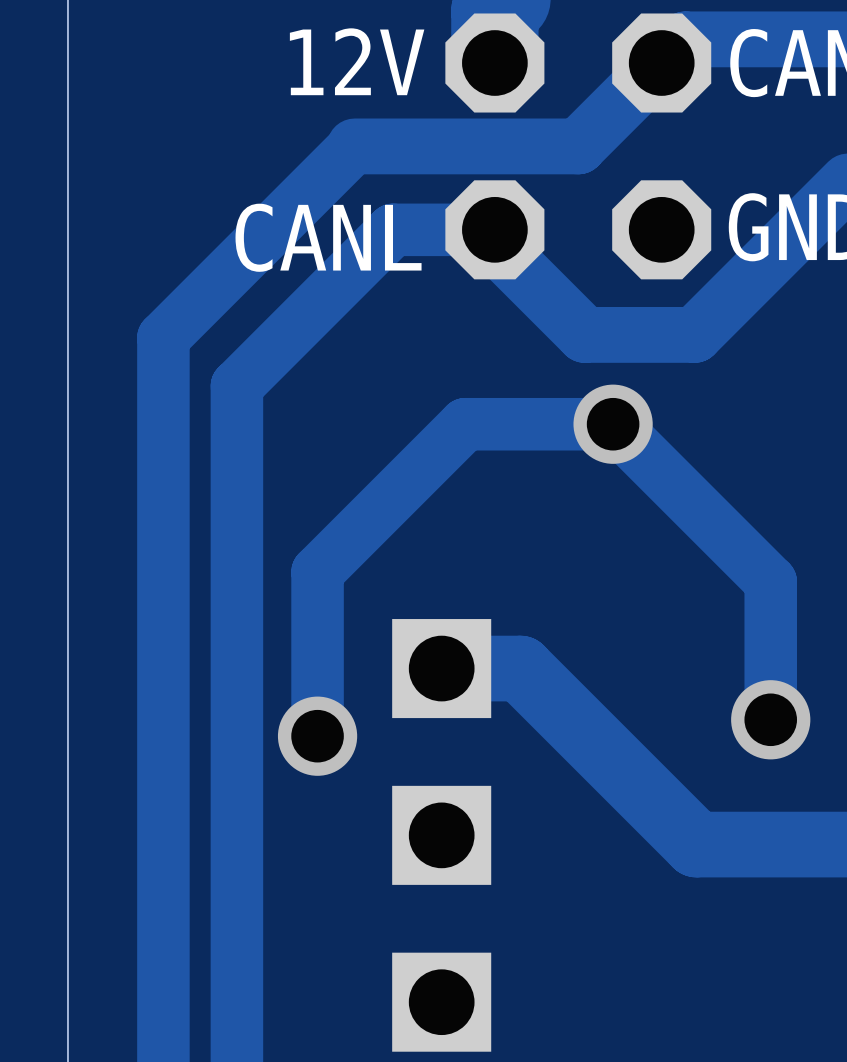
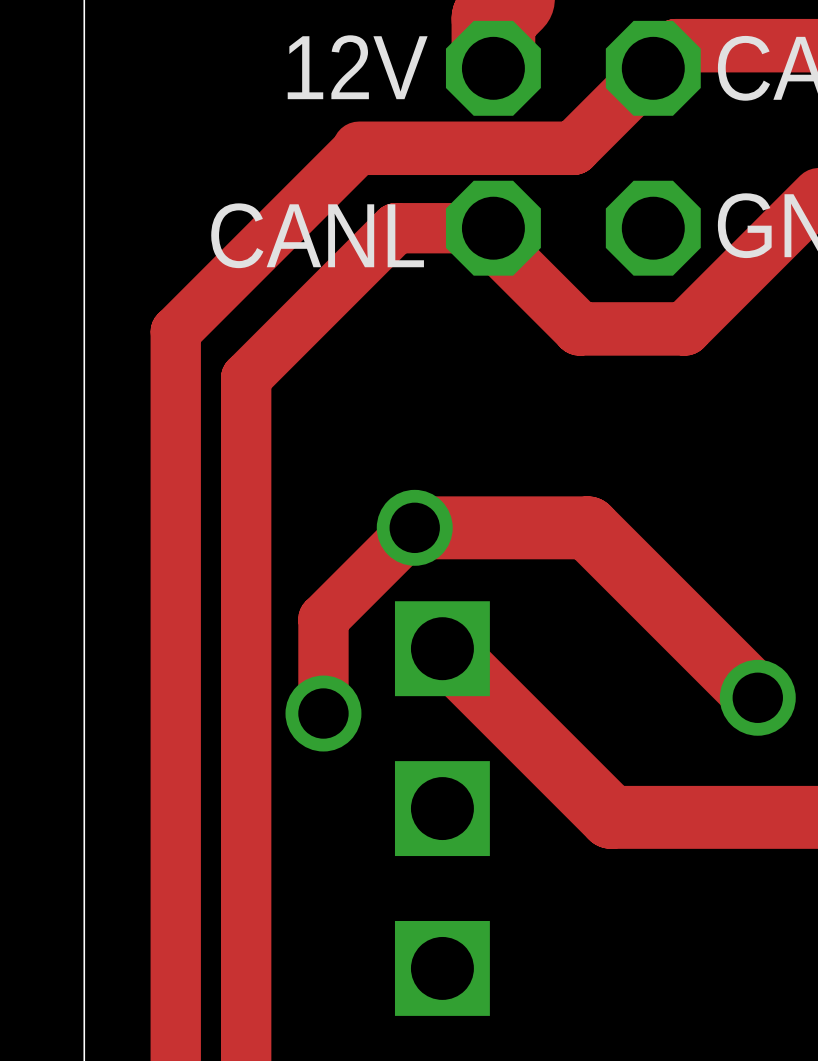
via: (613, 424) -> none
via: none -> (414, 527)
track: (317, 637) (317, 572) (465, 424) (613, 424) (770, 581) (770, 719) -> (323, 619) (414, 527) (587, 527) (757, 697)
track: (441, 668) (520, 668) (696, 844) -> (442, 648) (611, 817) (686, 817)

